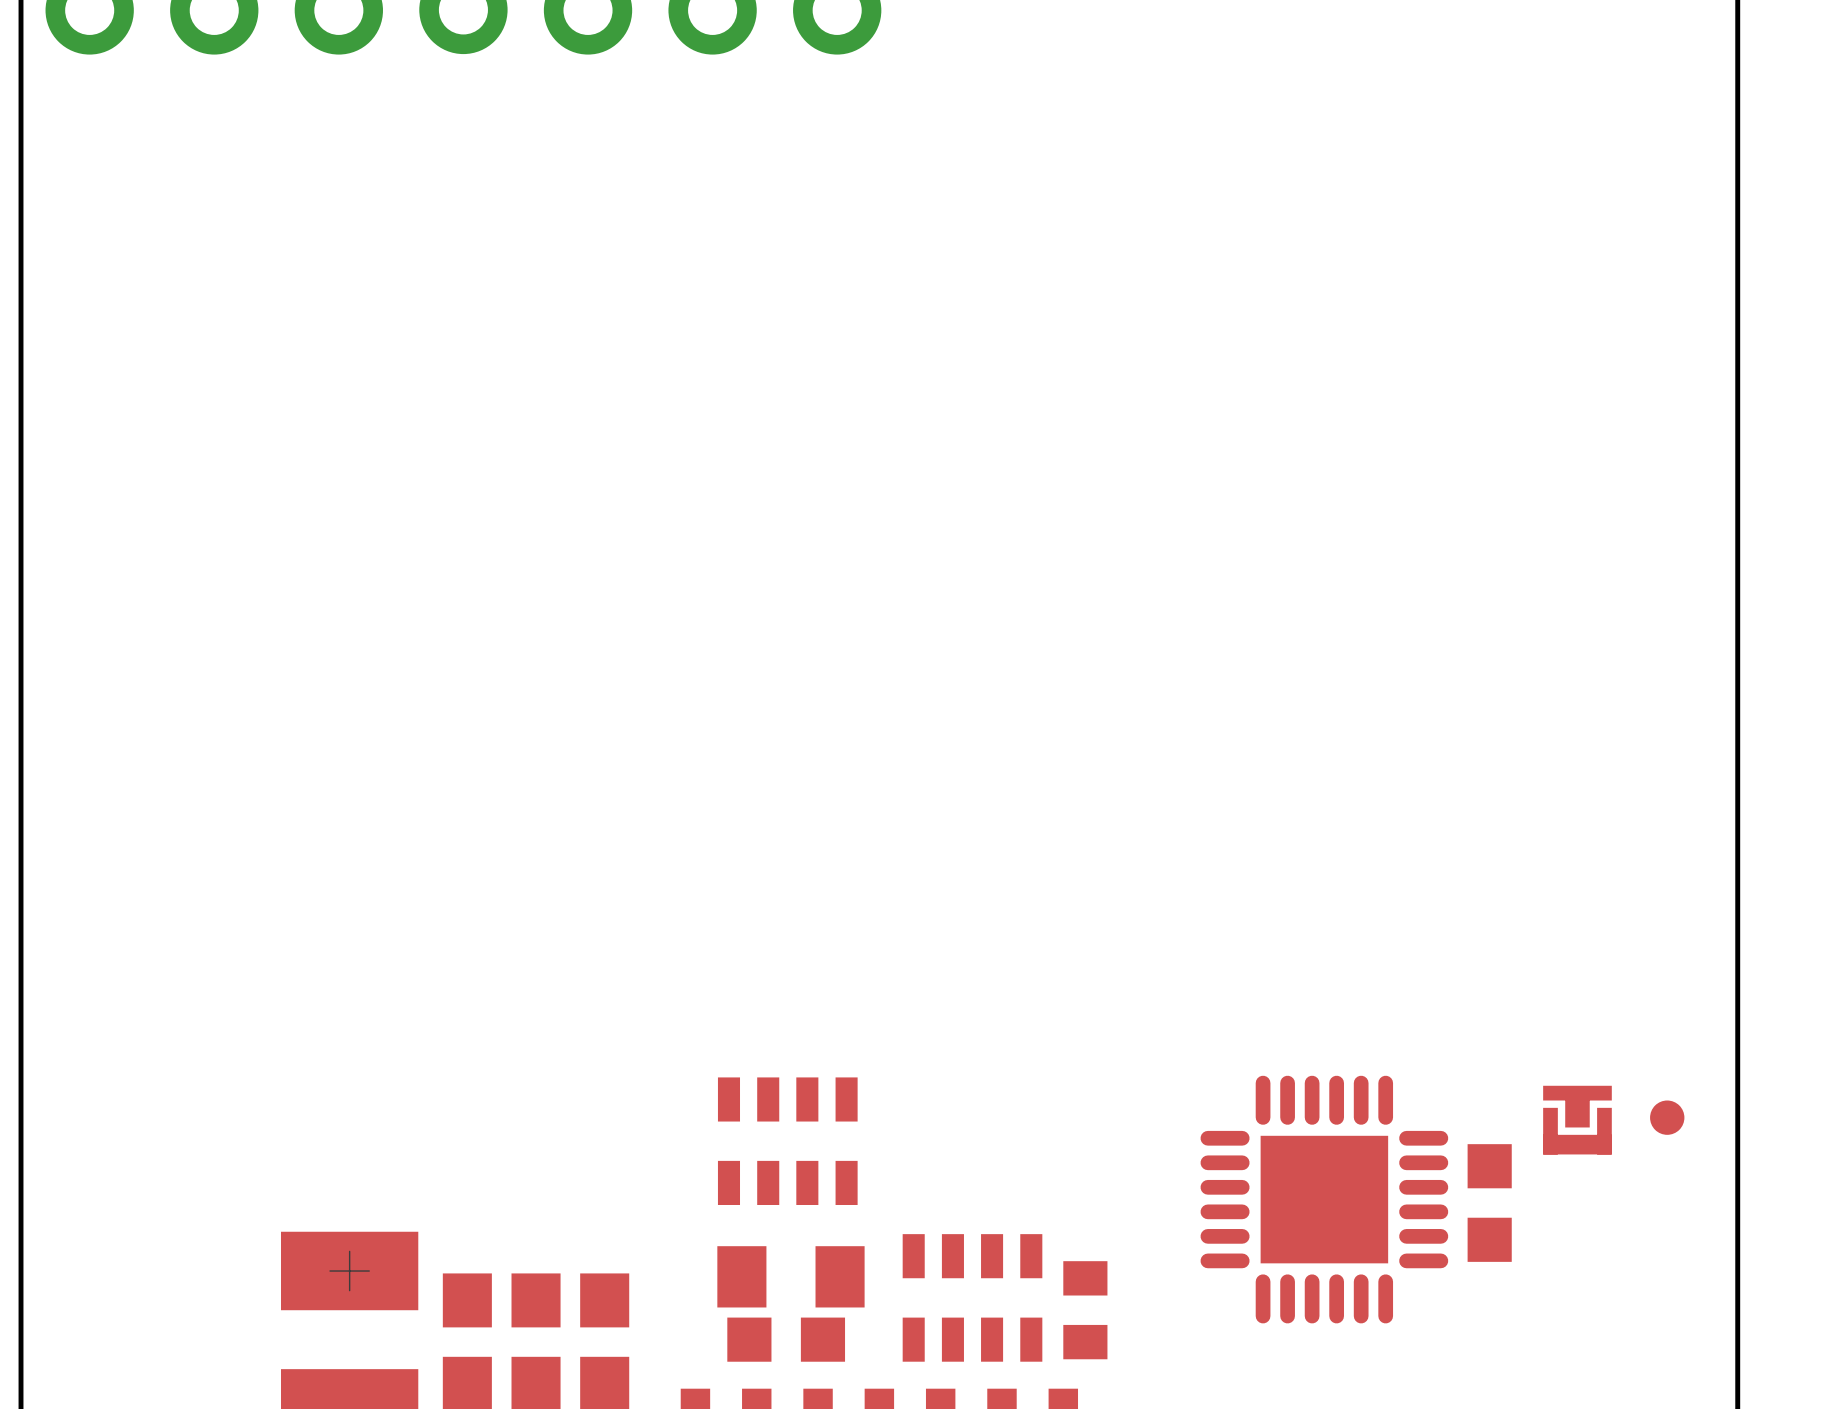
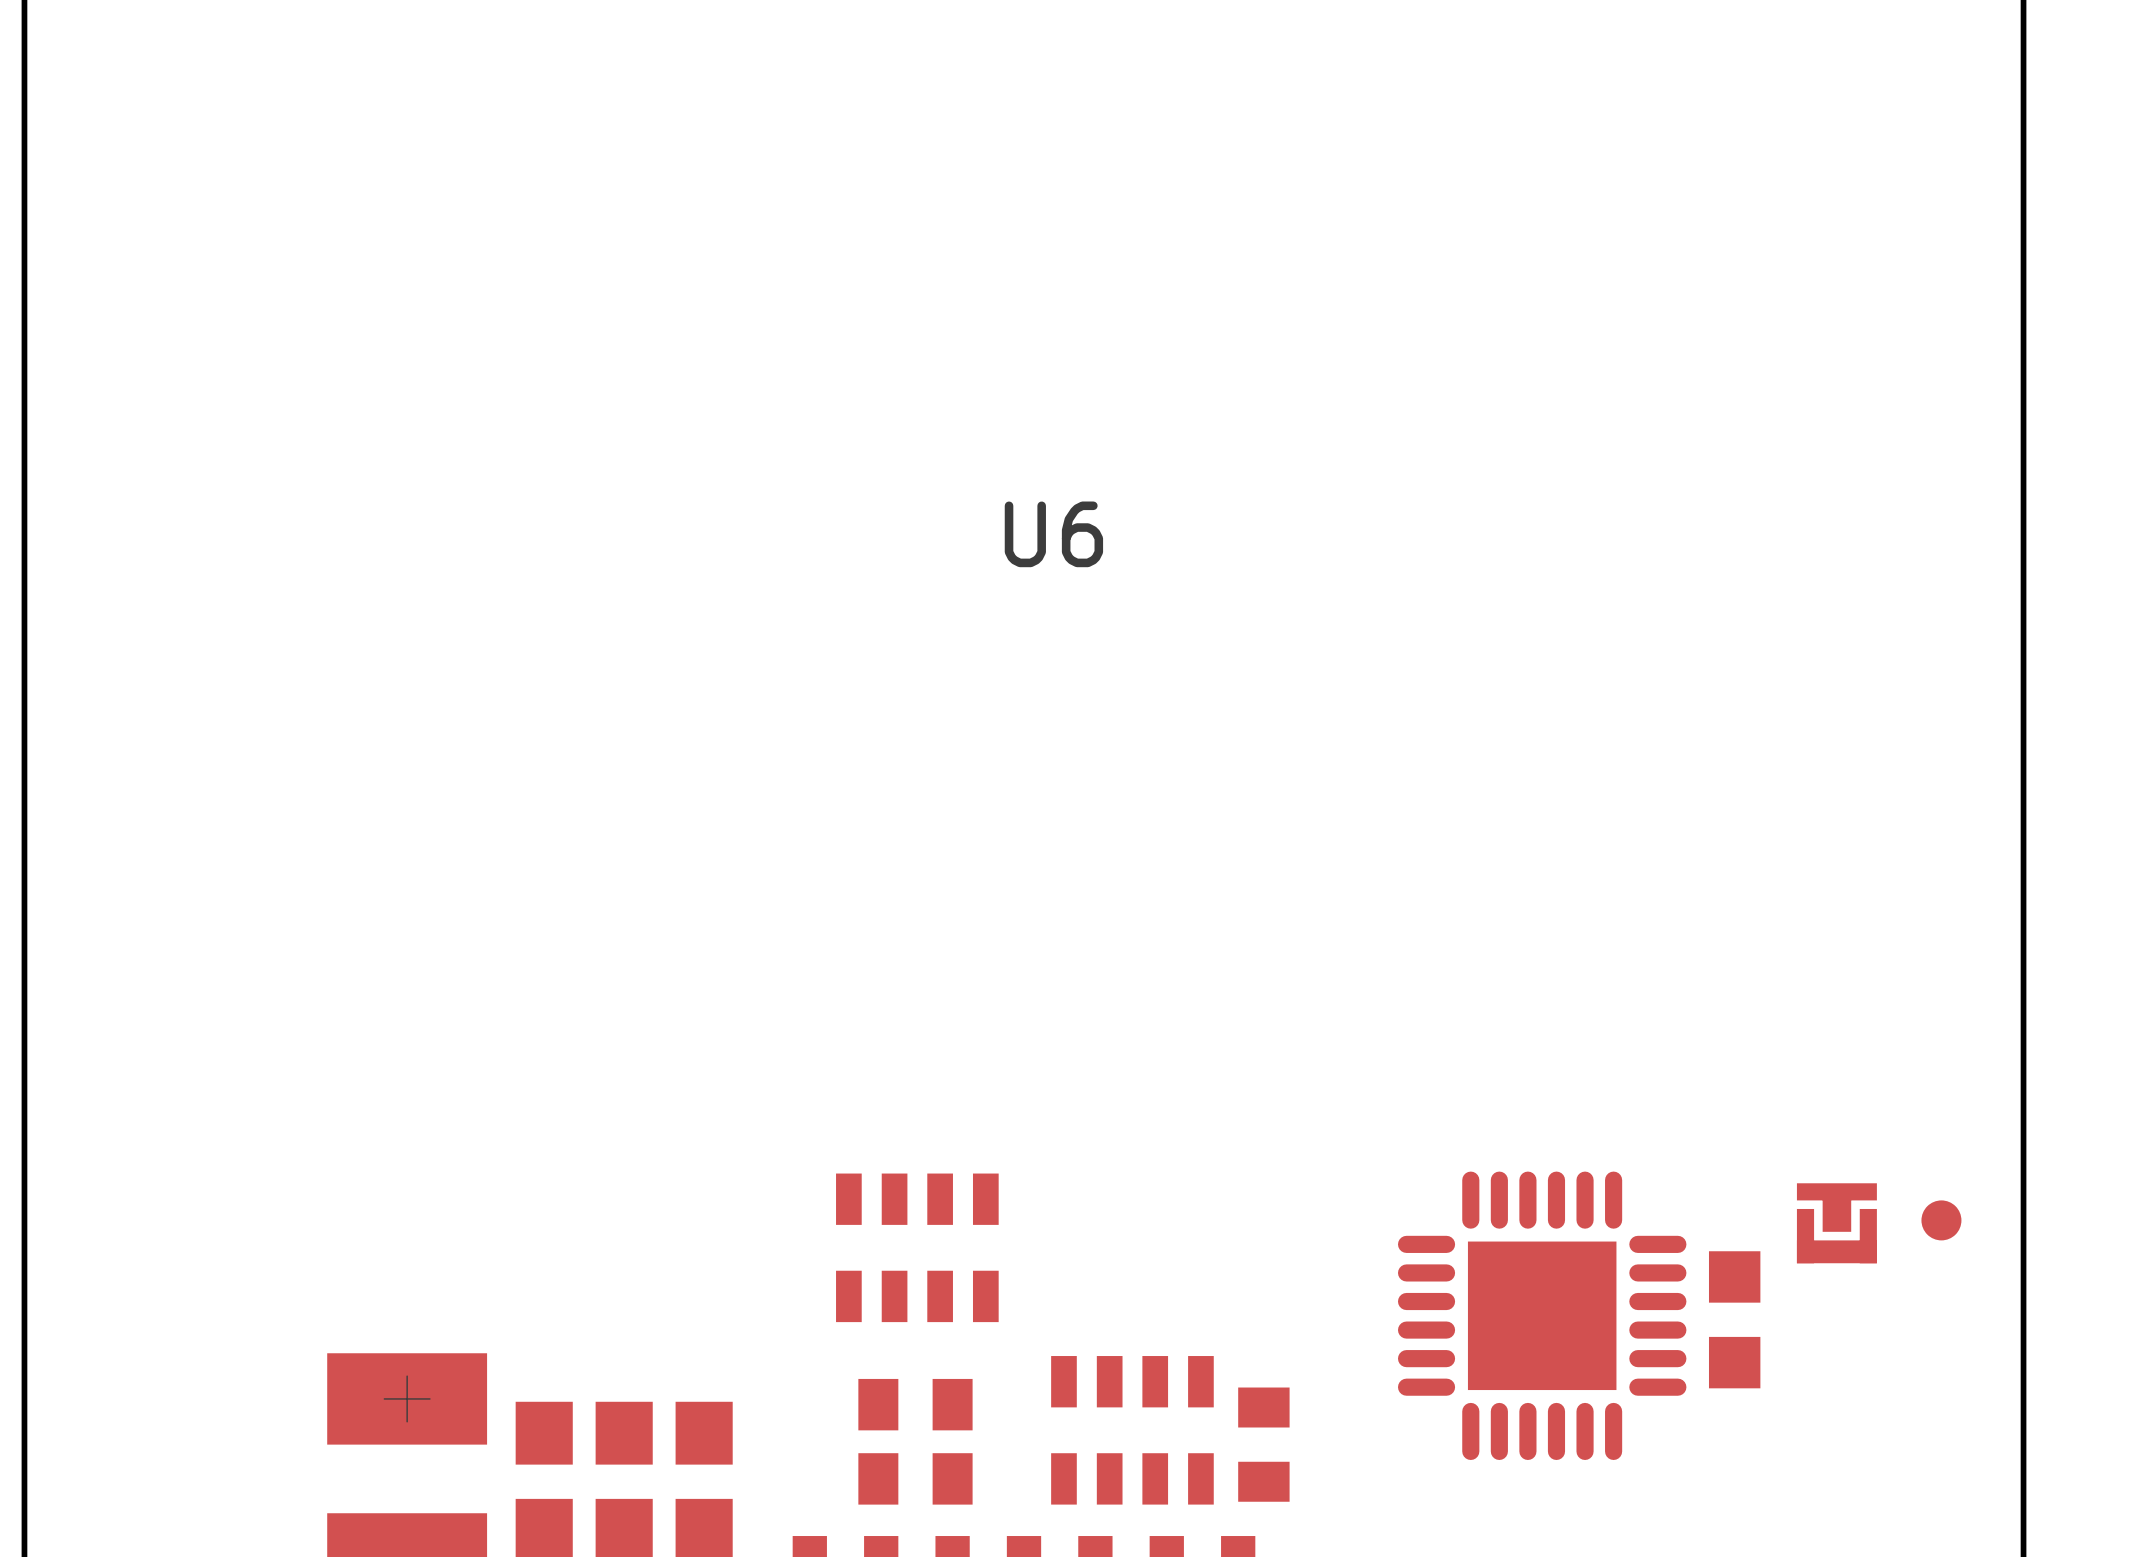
U6 name: none -> U6 (1053, 534)
part footprint: [717, 1246, 865, 1308] -> [858, 1378, 973, 1431]
part footprint: [727, 1317, 846, 1362] -> [858, 1453, 973, 1505]

